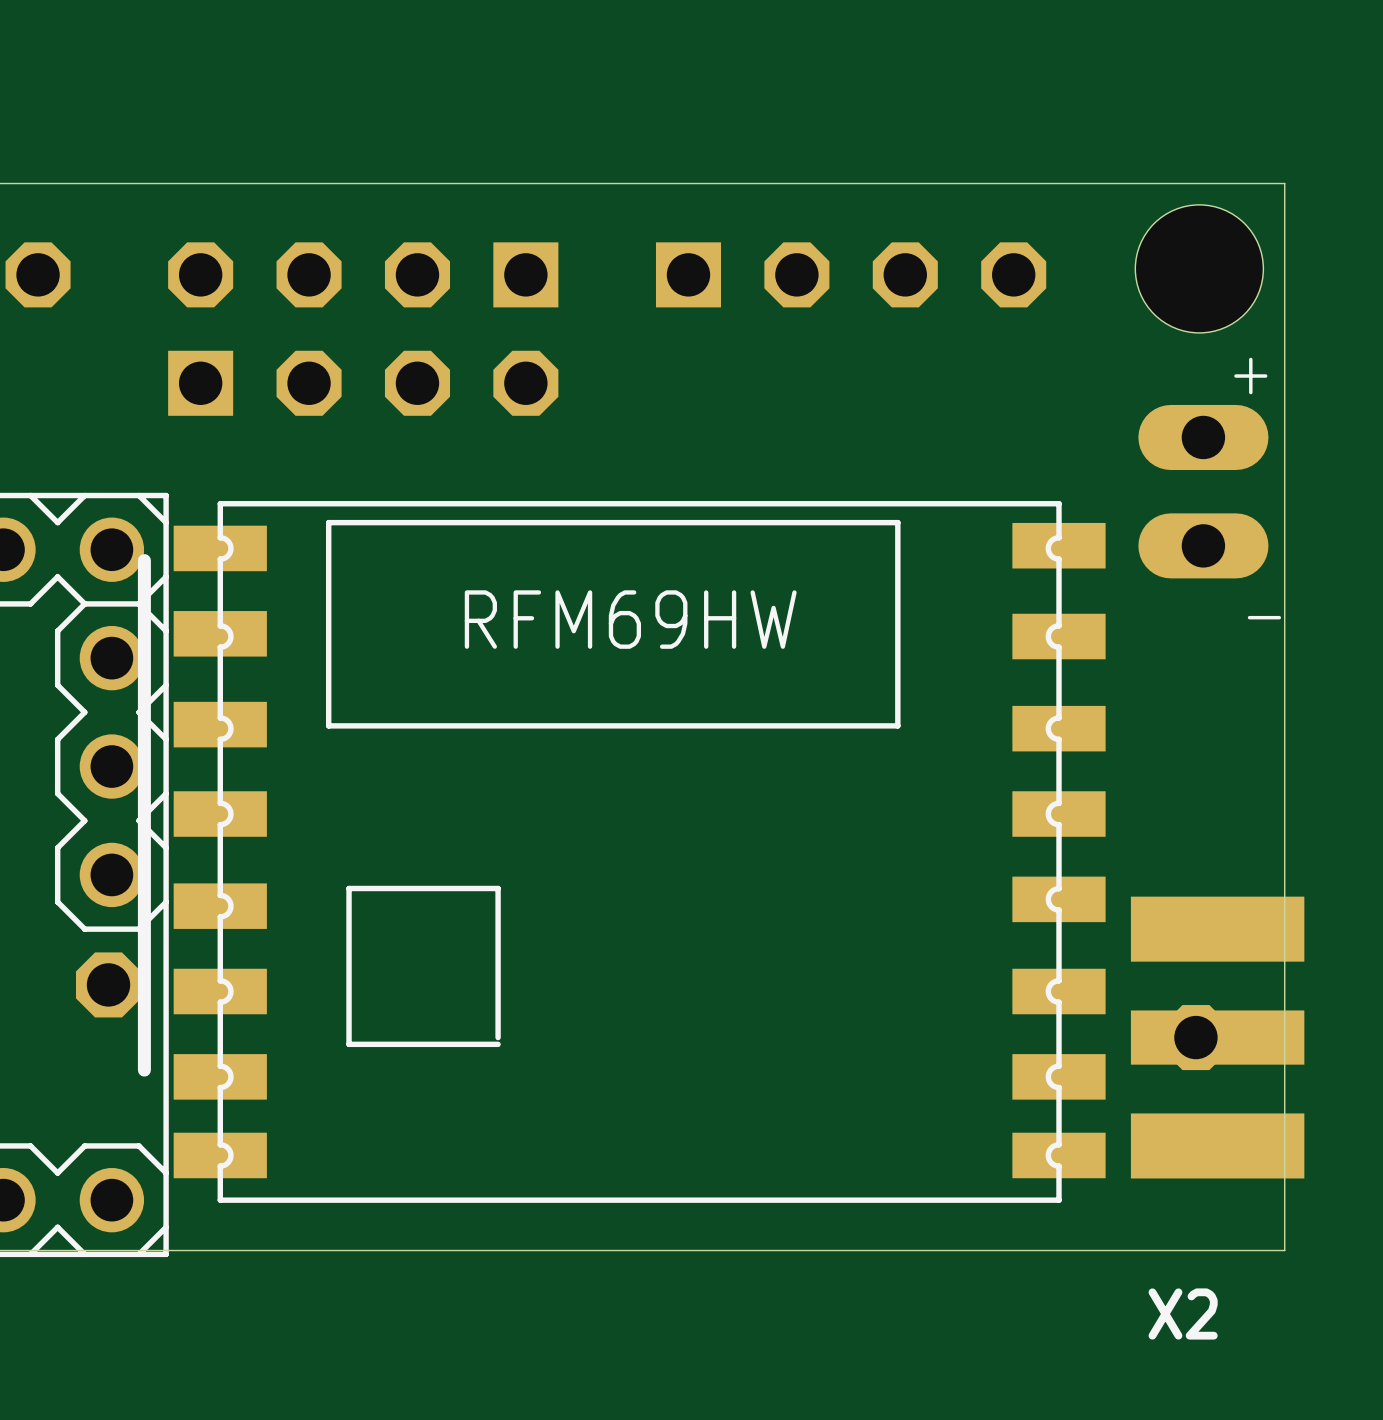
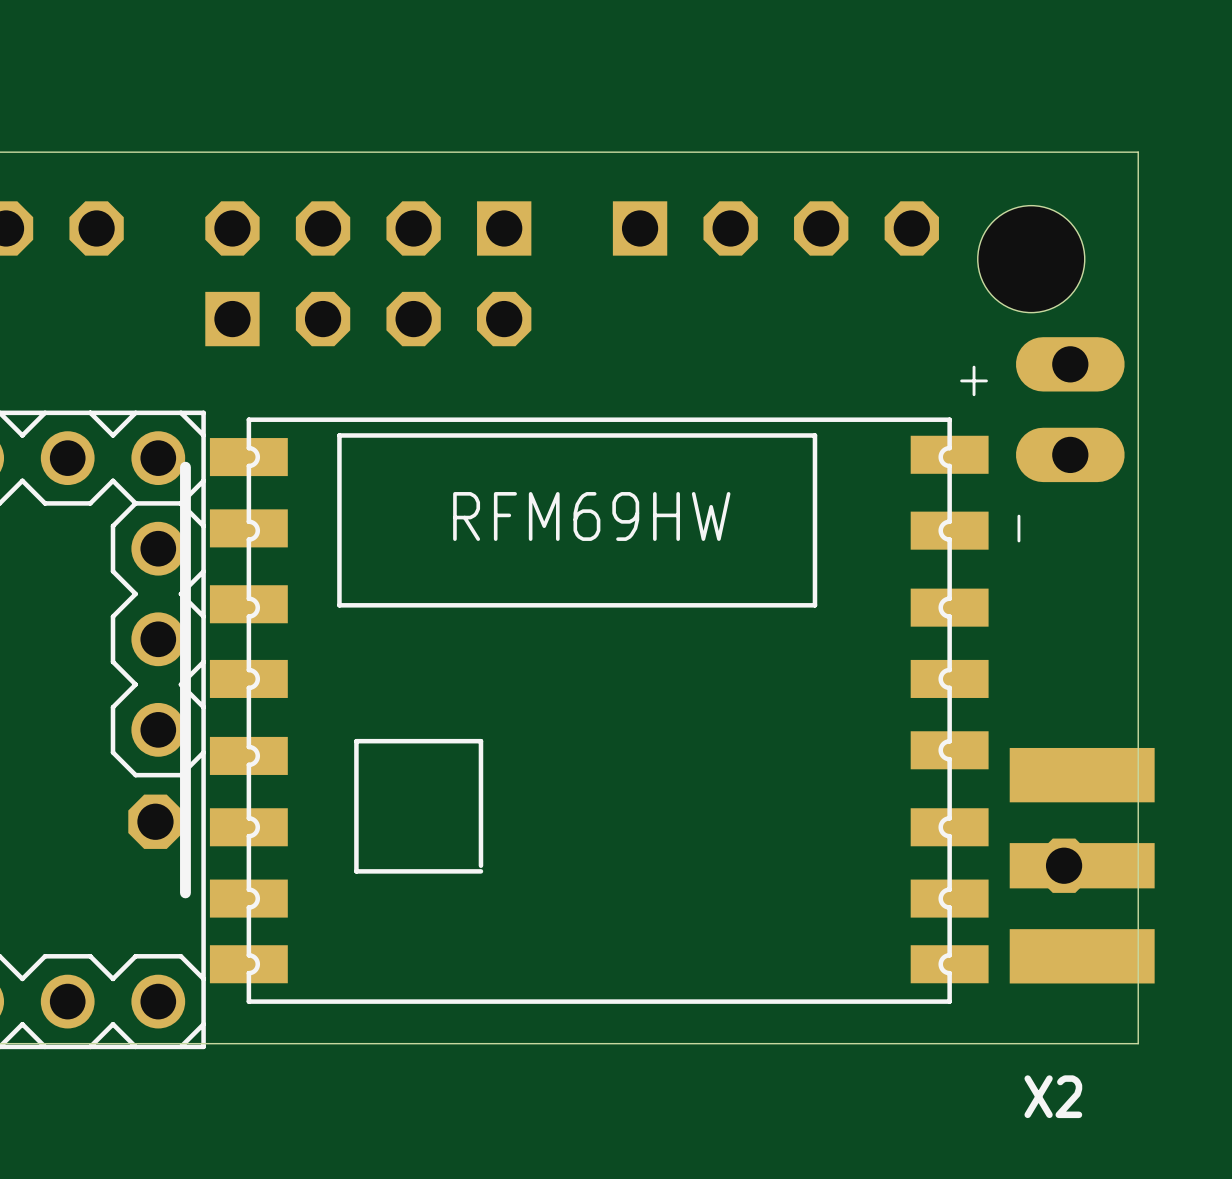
hole position: (1199, 268) -> (1031, 259)
text position: + (1250, 376) -> + (974, 380)
text rotation: 0° (1264, 617) -> 90° counterclockwise (1018, 528)
text position: - (1264, 617) -> - (1018, 528)

